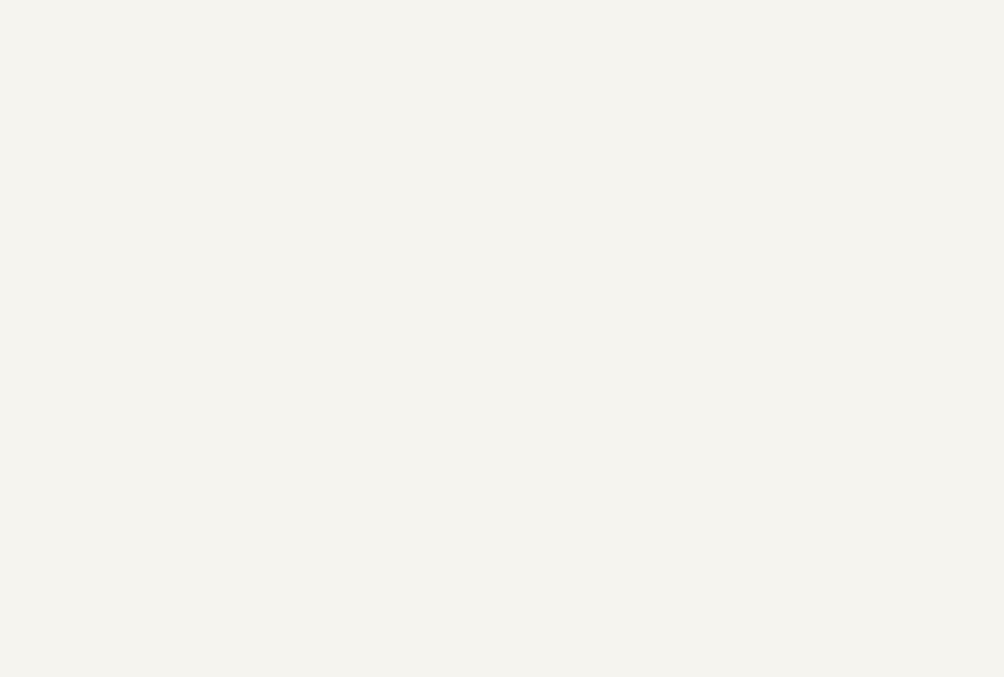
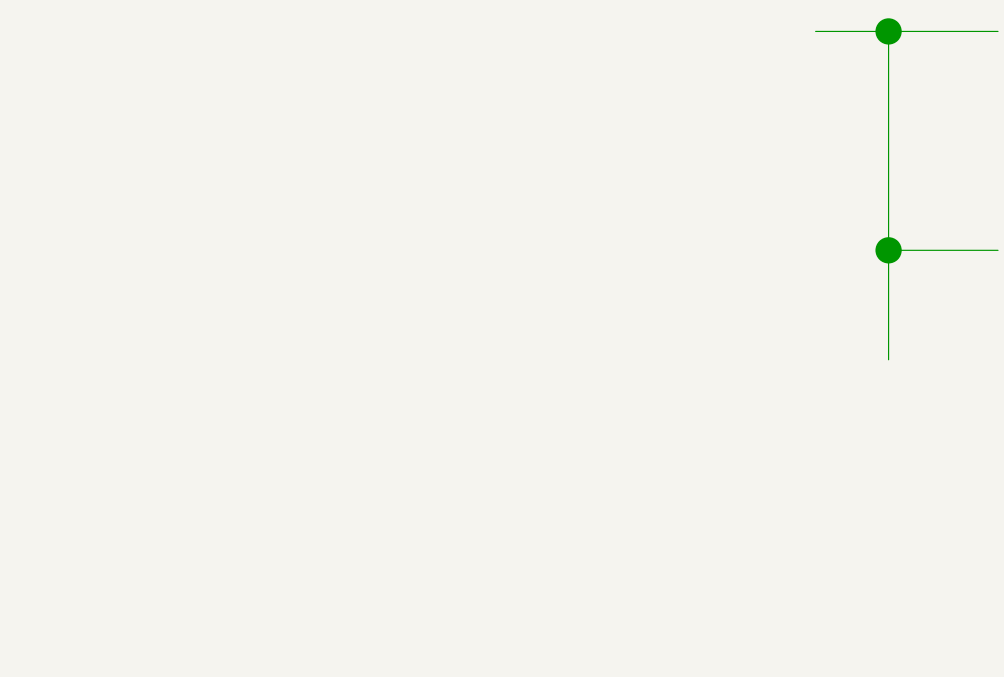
wire: none -> (815, 31) (998, 31)
wire: none -> (888, 31) (888, 359)
junction: none -> (888, 31)
wire: none -> (888, 250) (998, 250)
junction: none -> (888, 250)

